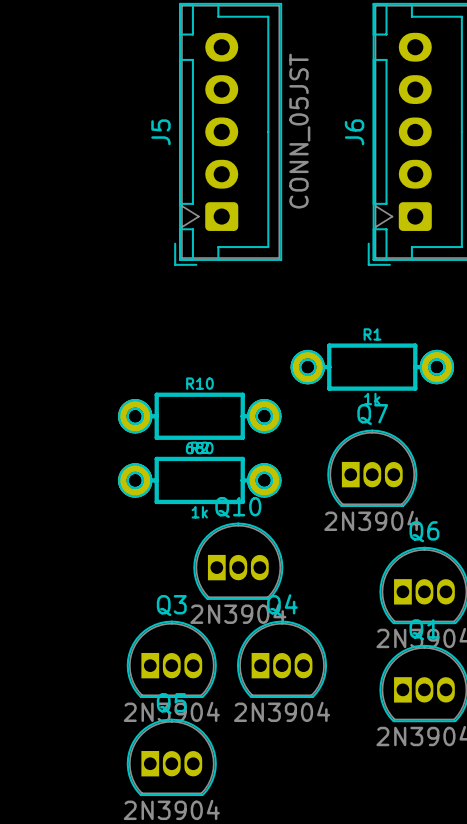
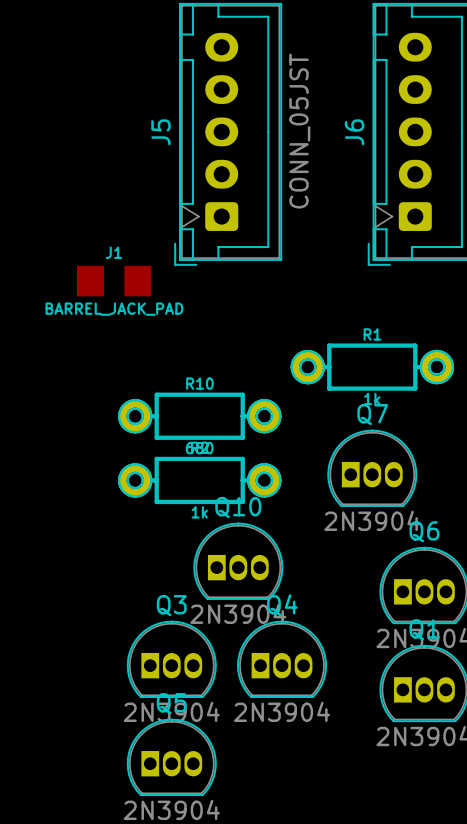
J1: none -> BARREL_JACK_PAD (114, 281)

